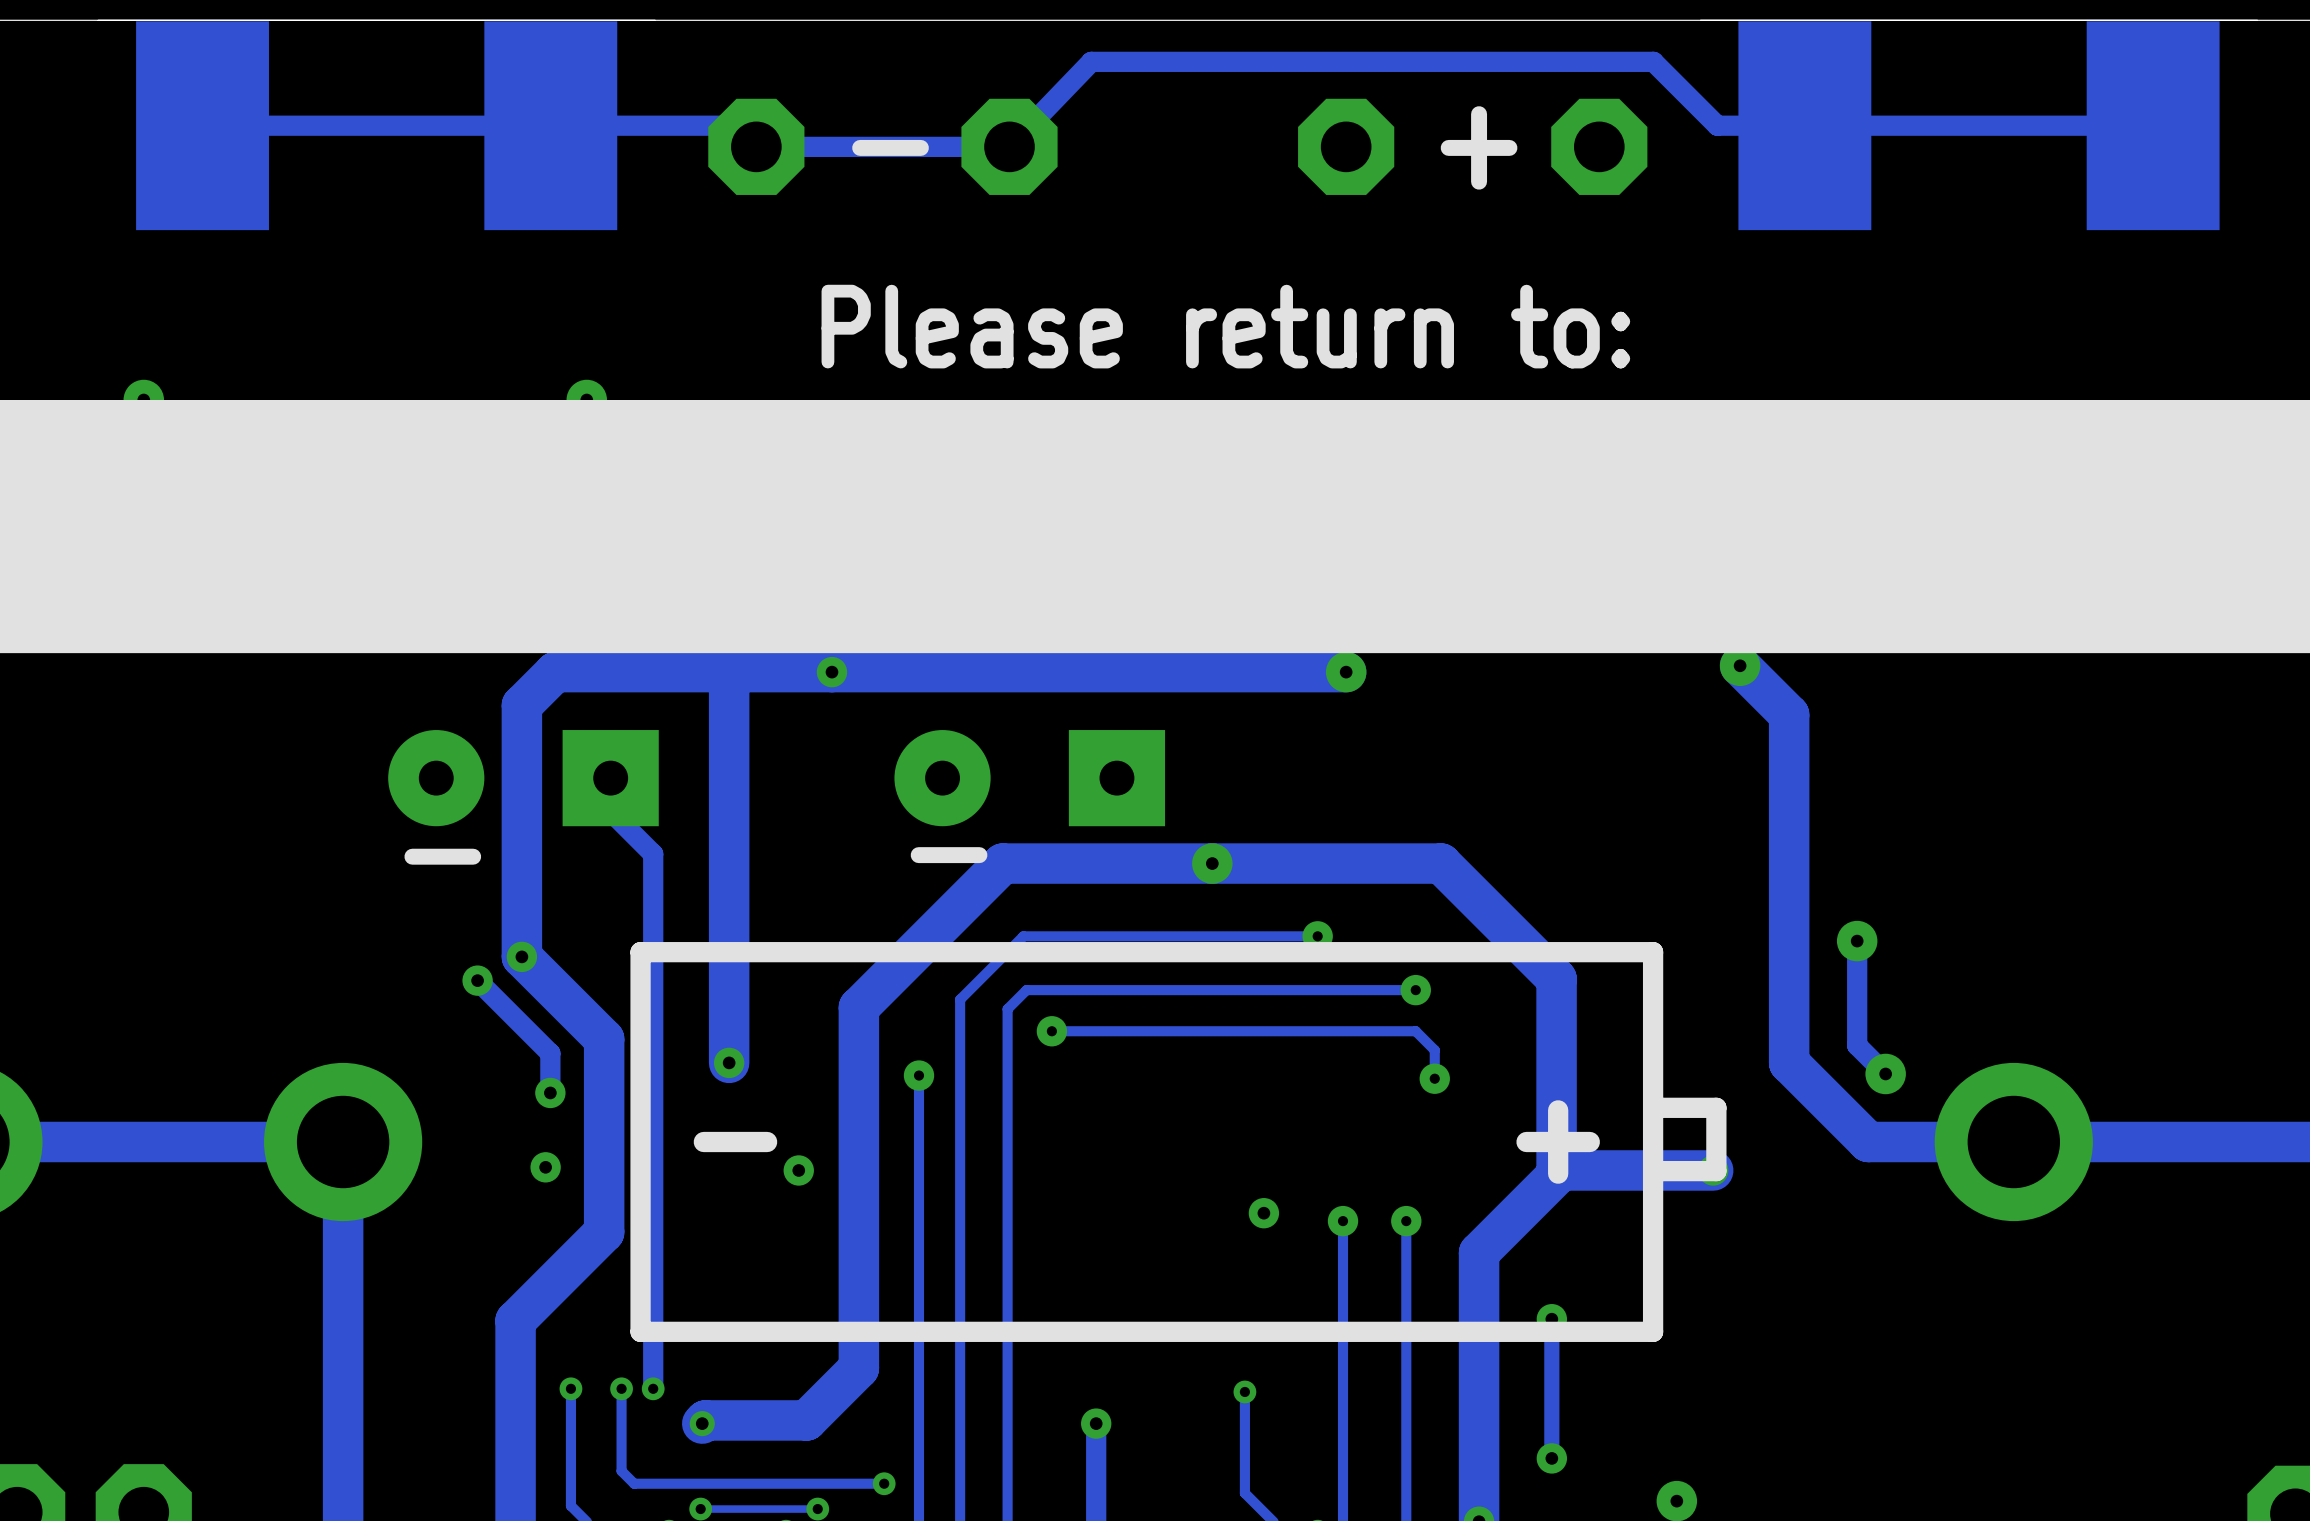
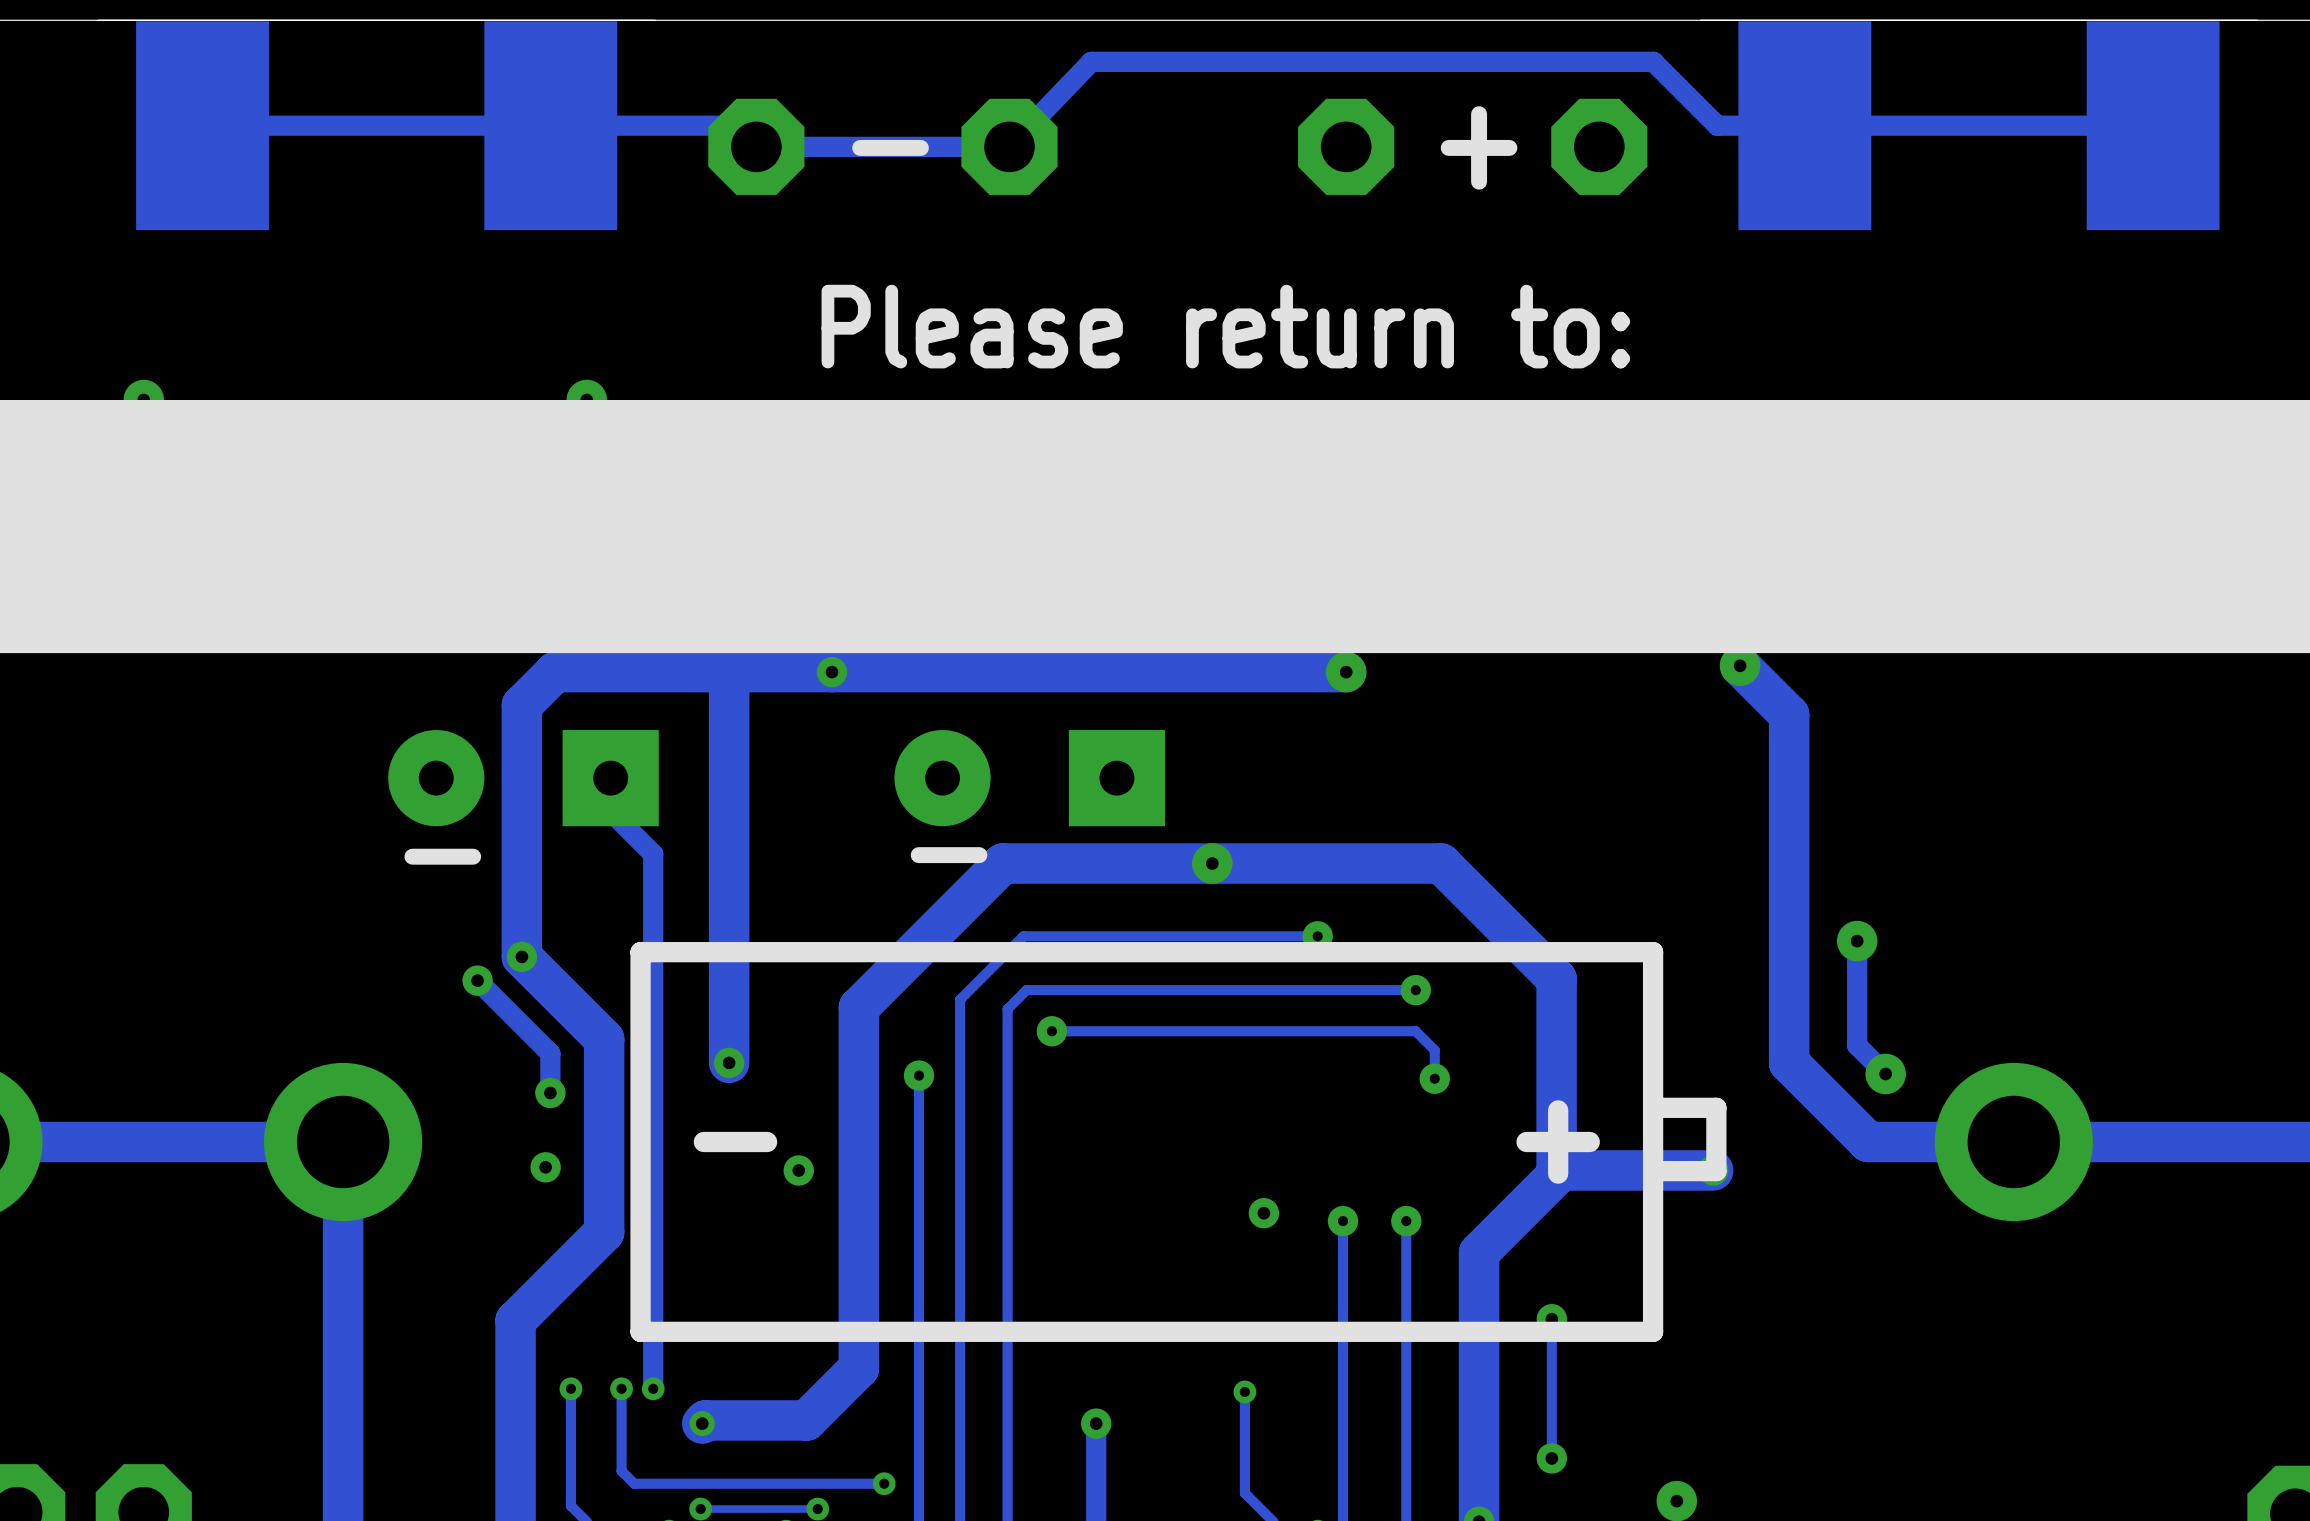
track width: thick (1551, 1319) (1551, 1458) -> thin (1551, 1319) (1551, 1458)

